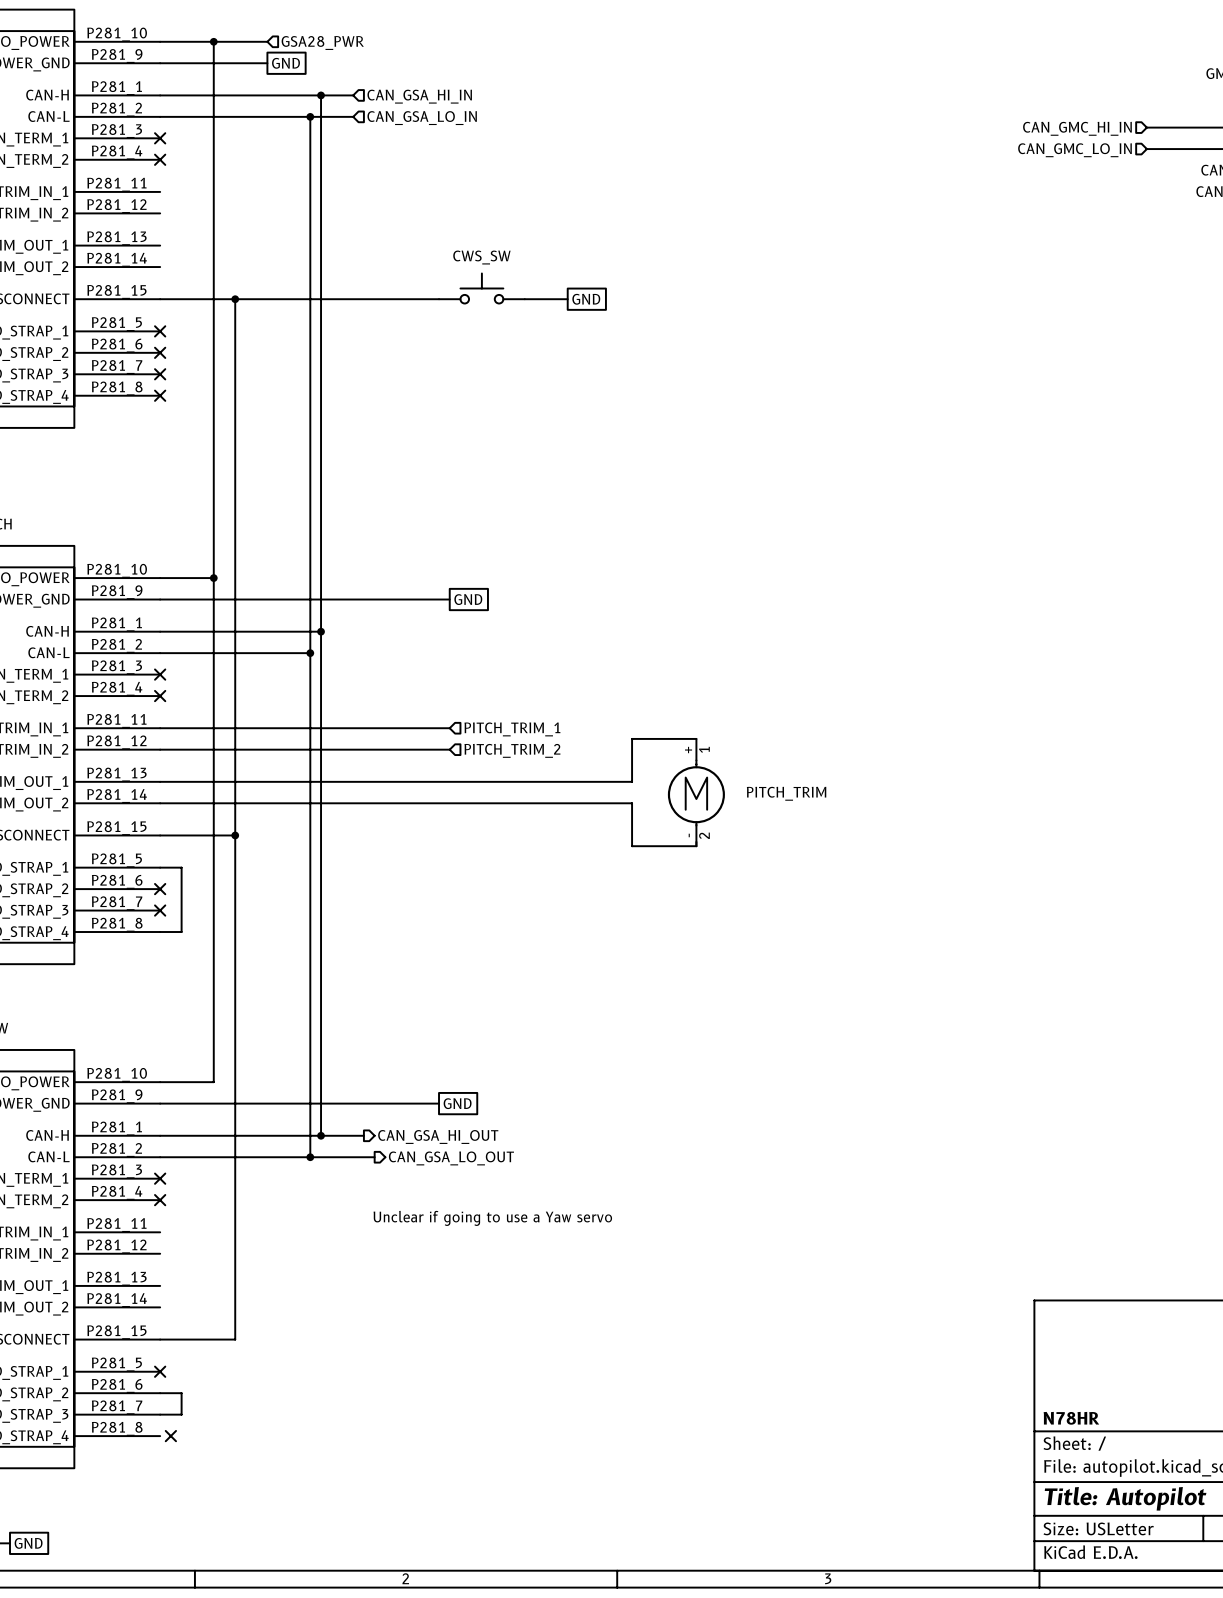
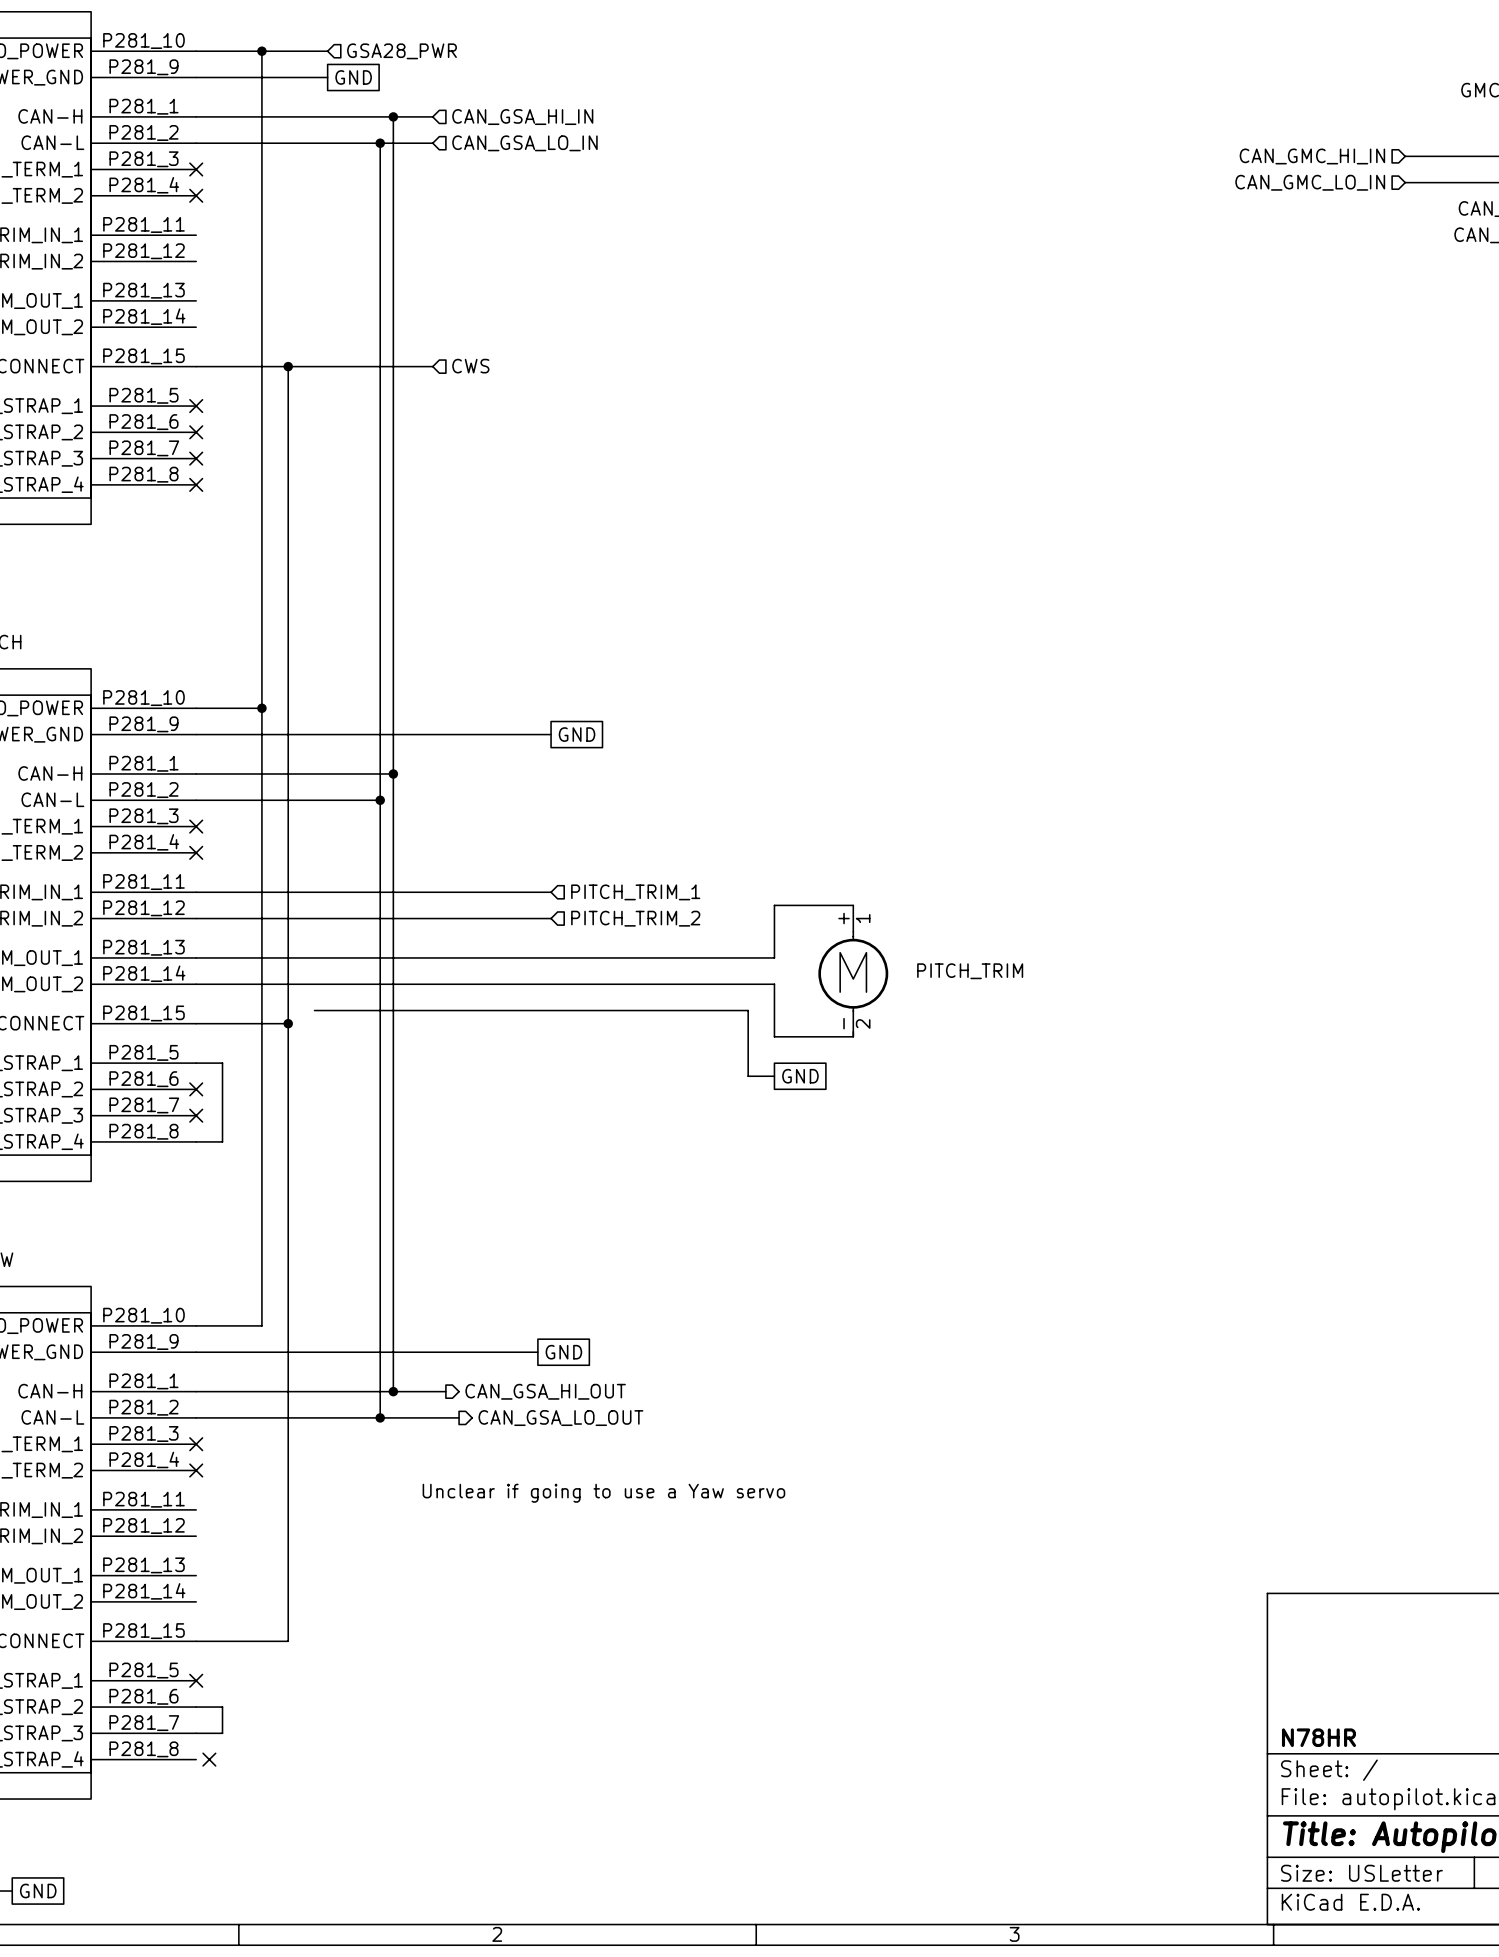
CWS_SW: (481, 288) -> none
hierarchical label: none -> CWS (470, 366)
wire: (353, 299) (439, 299) -> none
wire: (524, 299) (567, 299) -> none
global label: GND (586, 299) -> none
wire: none -> (314, 1010) (748, 1010) (748, 1076) (774, 1076)
global label: none -> GND (800, 1076)

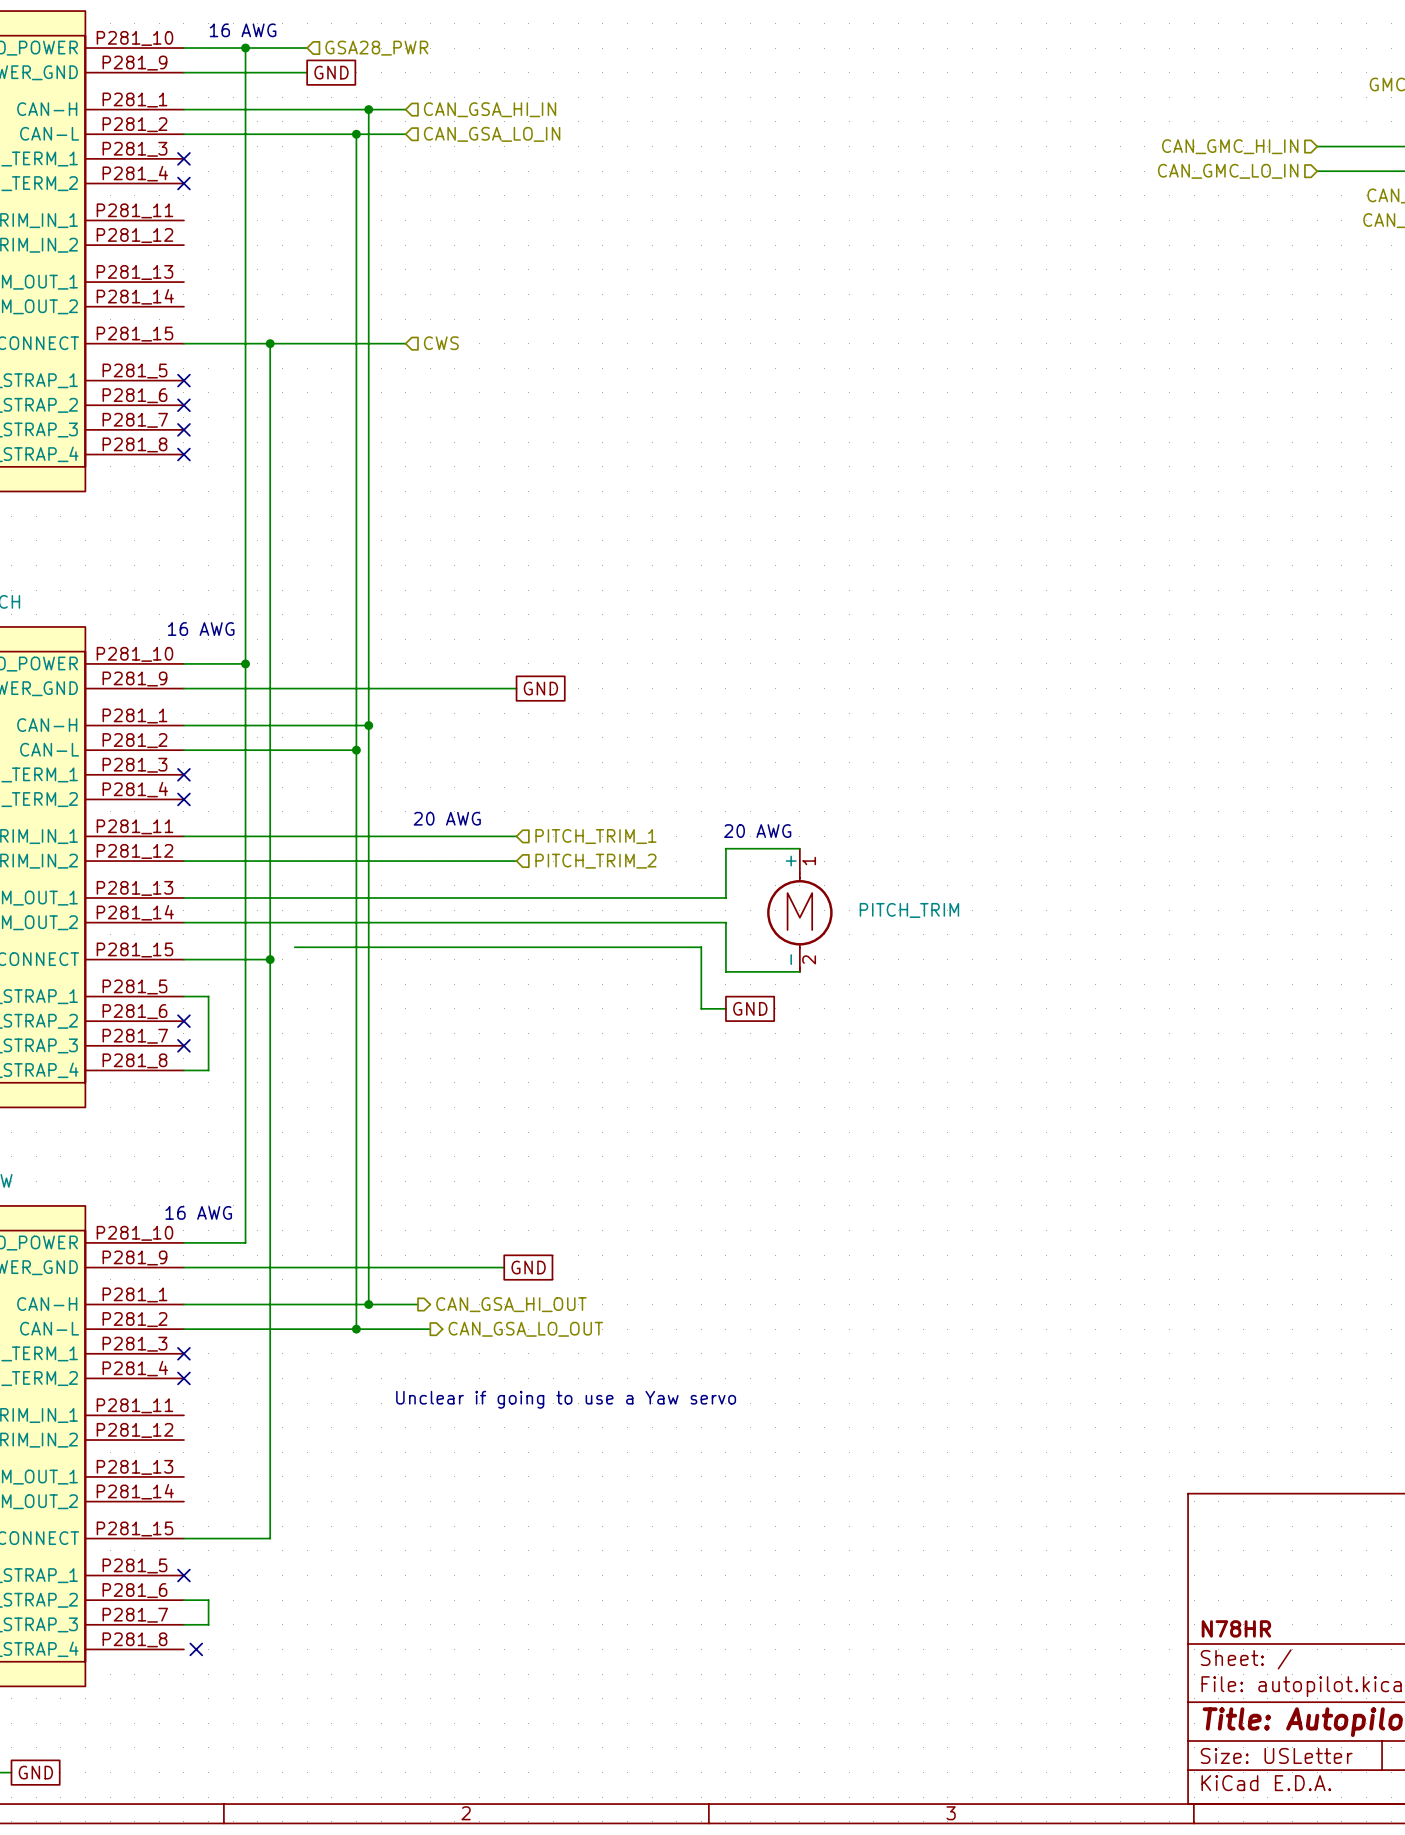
text: none -> 16 AWG (243, 30)
text: none -> 16 AWG (201, 629)
text: none -> 20 AWG (447, 818)
text: none -> 20 AWG (757, 831)
text: none -> 16 AWG (198, 1212)

